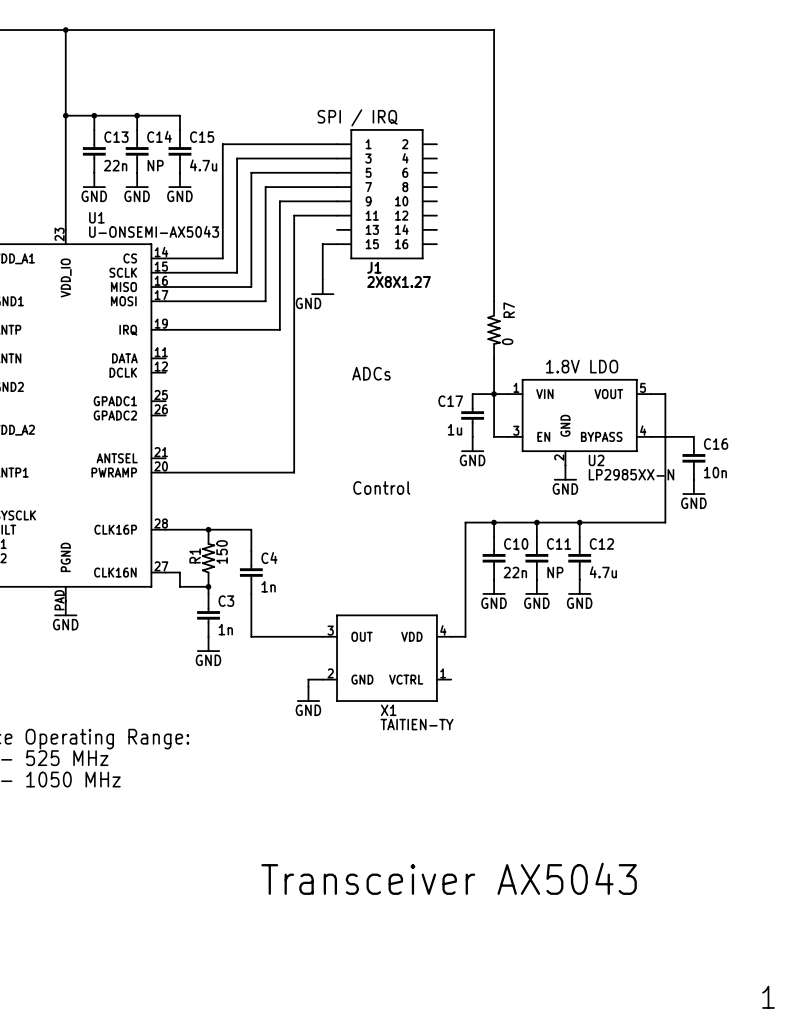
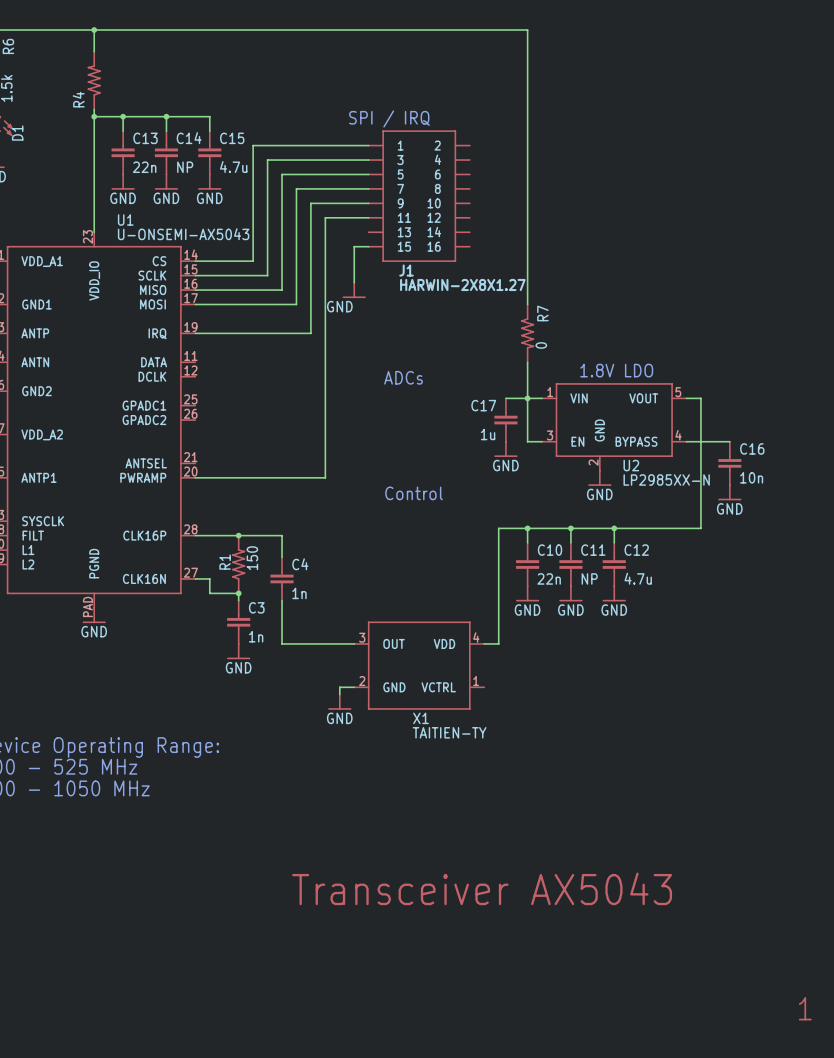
R4: none -> (94, 80)
J1 value: 2X8X1.27 (399, 282) -> HARWIN-2X8X1.27 (462, 284)

